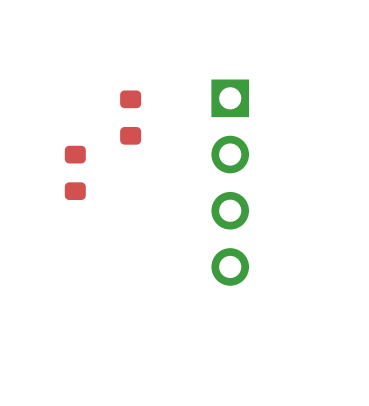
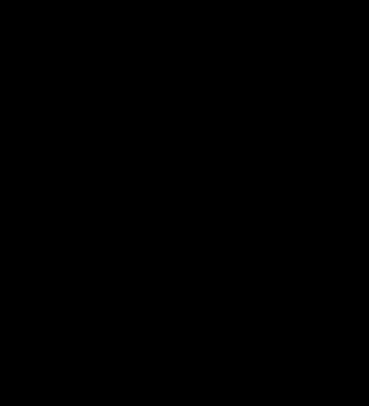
part: (130, 117) -> none
part: (75, 172) -> none
part: (230, 182) -> none

